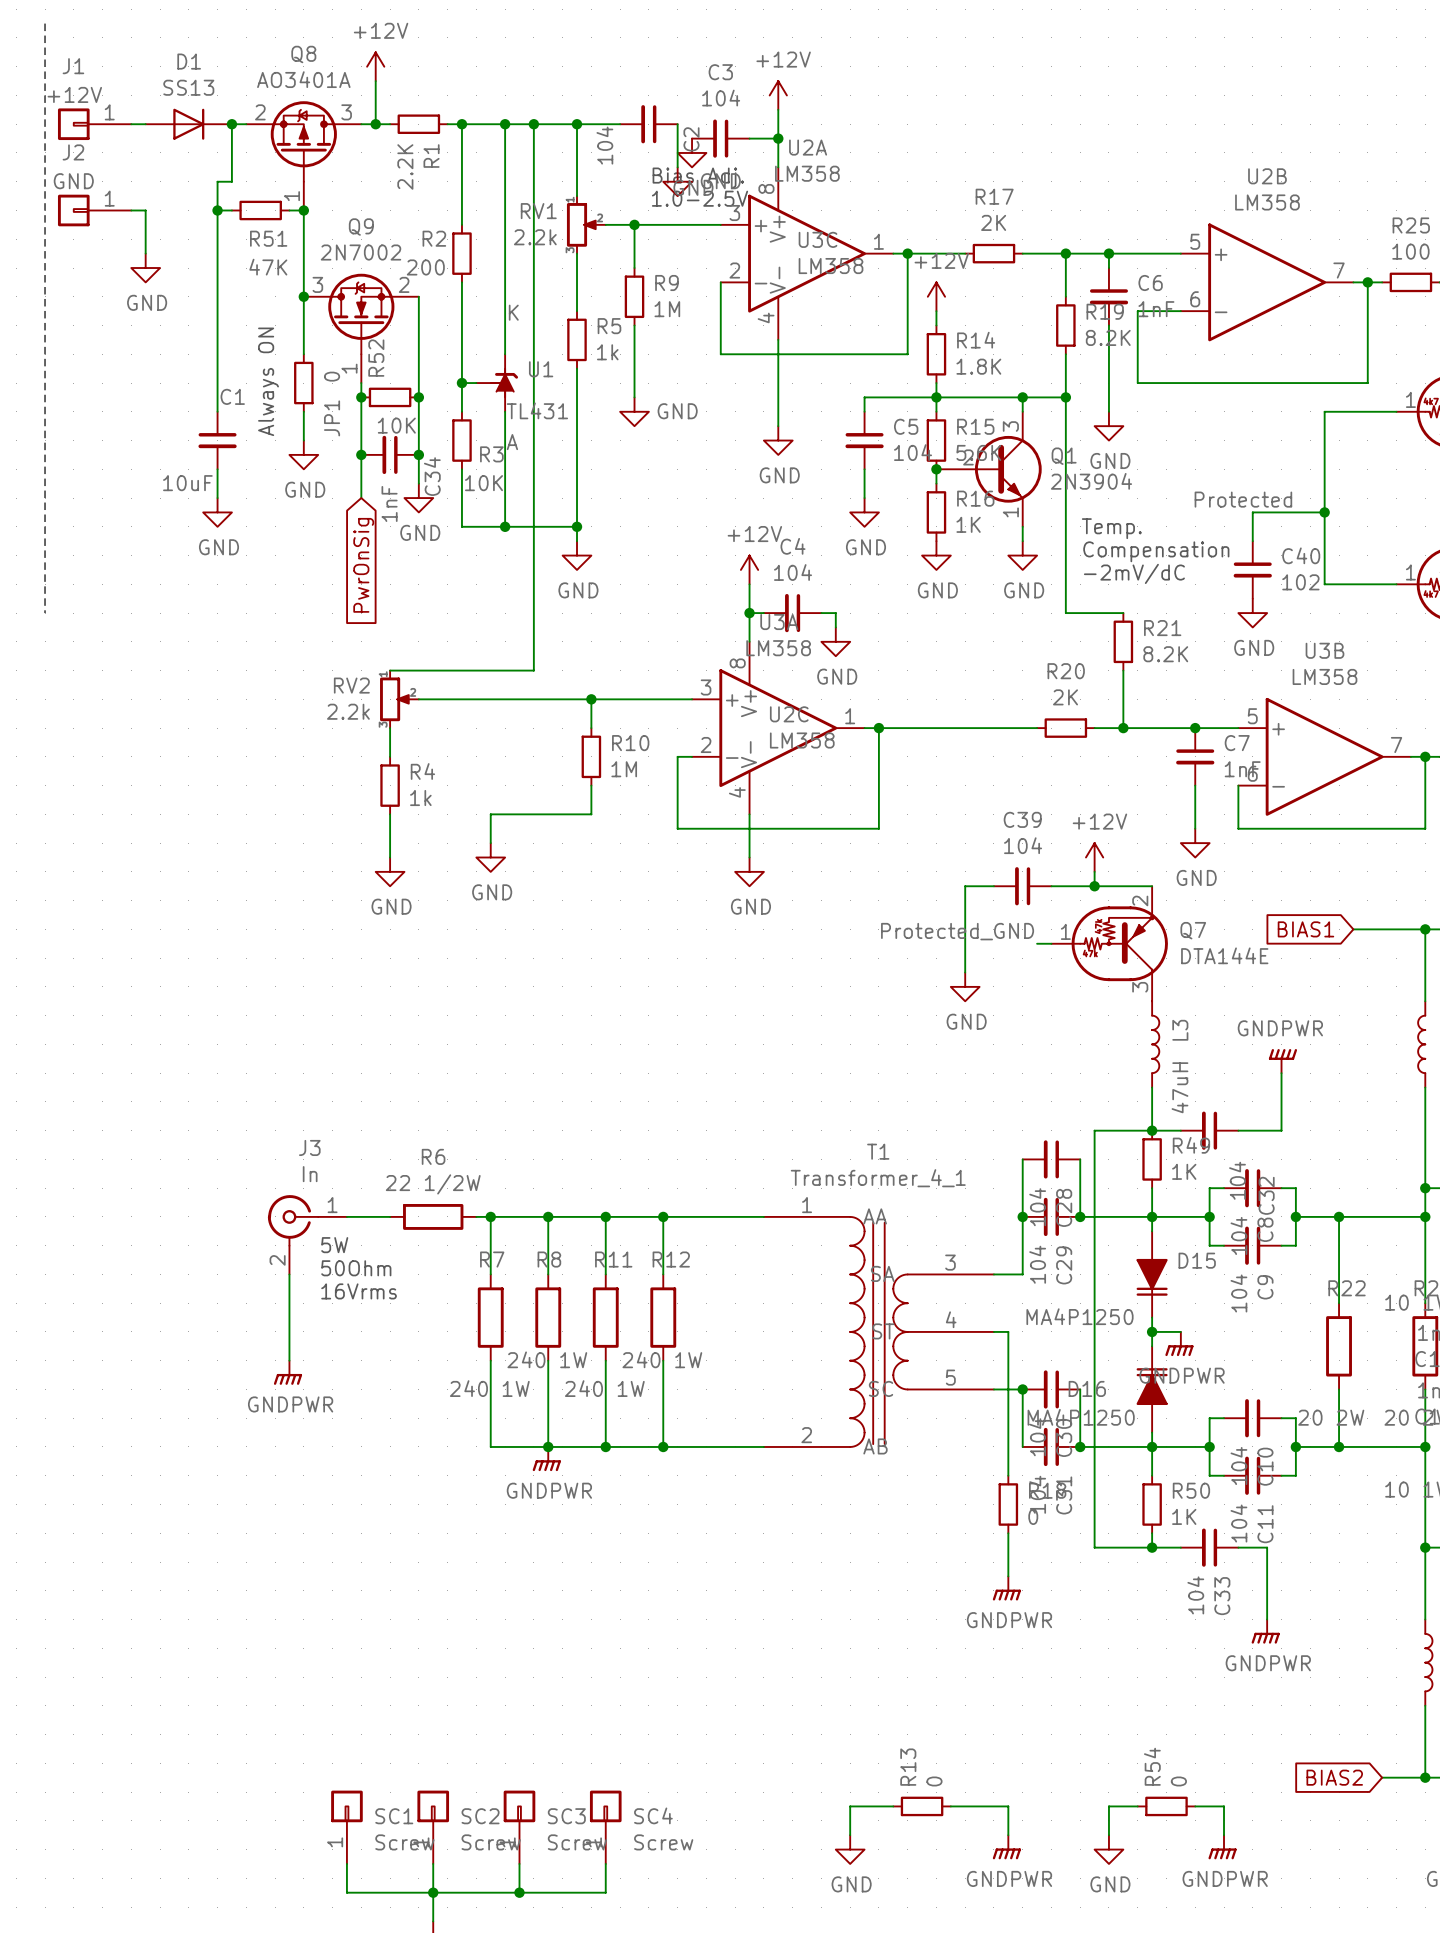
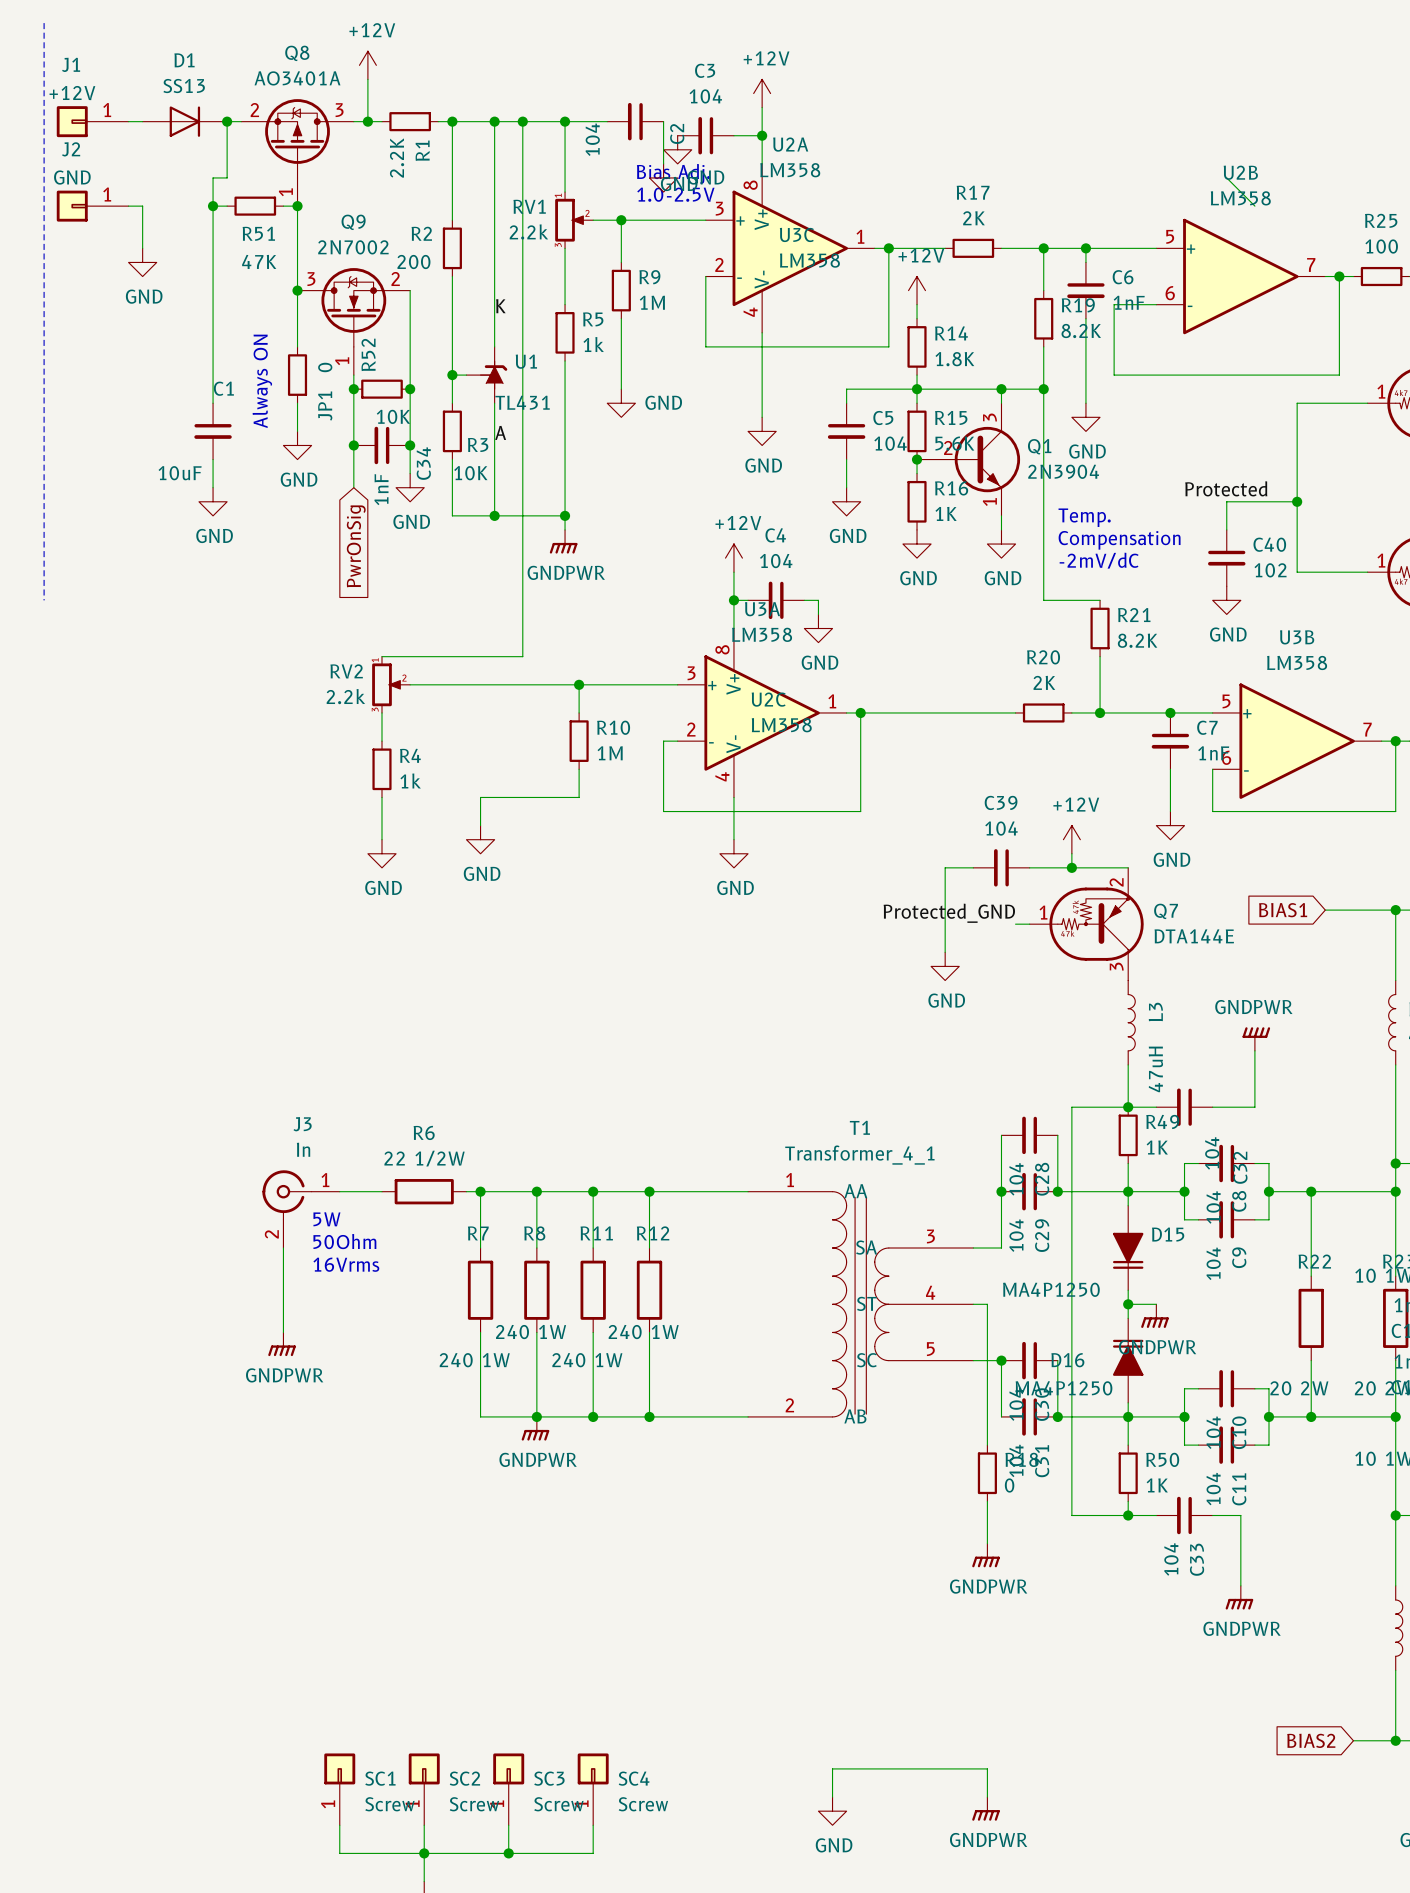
wire: none -> (1226, 177) (1254, 206)
power symbol: GND (577, 555) -> GNDPWR (563, 541)
wire: none -> (874, 1768) (931, 1768)
R13: 0 (922, 1806) -> none
wire: (1137, 1806) (1108, 1806) (1108, 1835) -> none
R54: 0 (1166, 1806) -> none
wire: (1195, 1806) (1224, 1806) (1224, 1835) -> none
power symbol: GNDPWR (1222, 1847) -> none
power symbol: GND (1108, 1849) -> none

